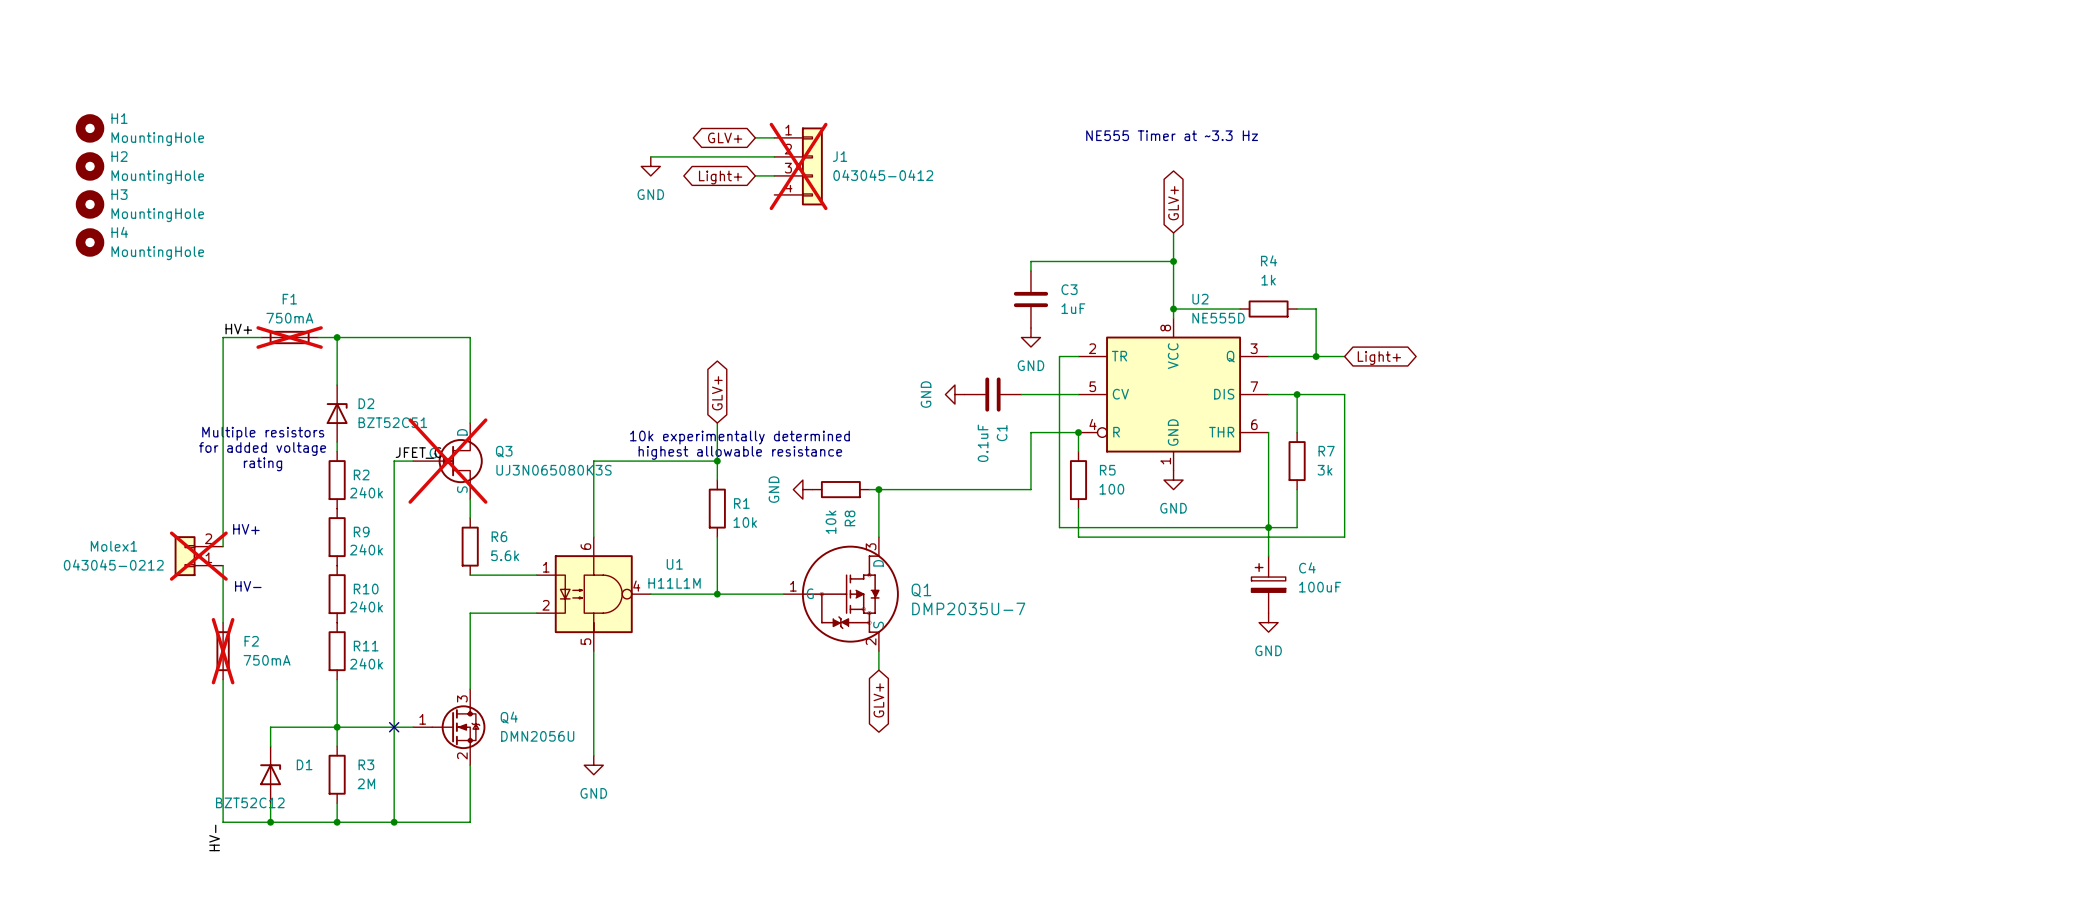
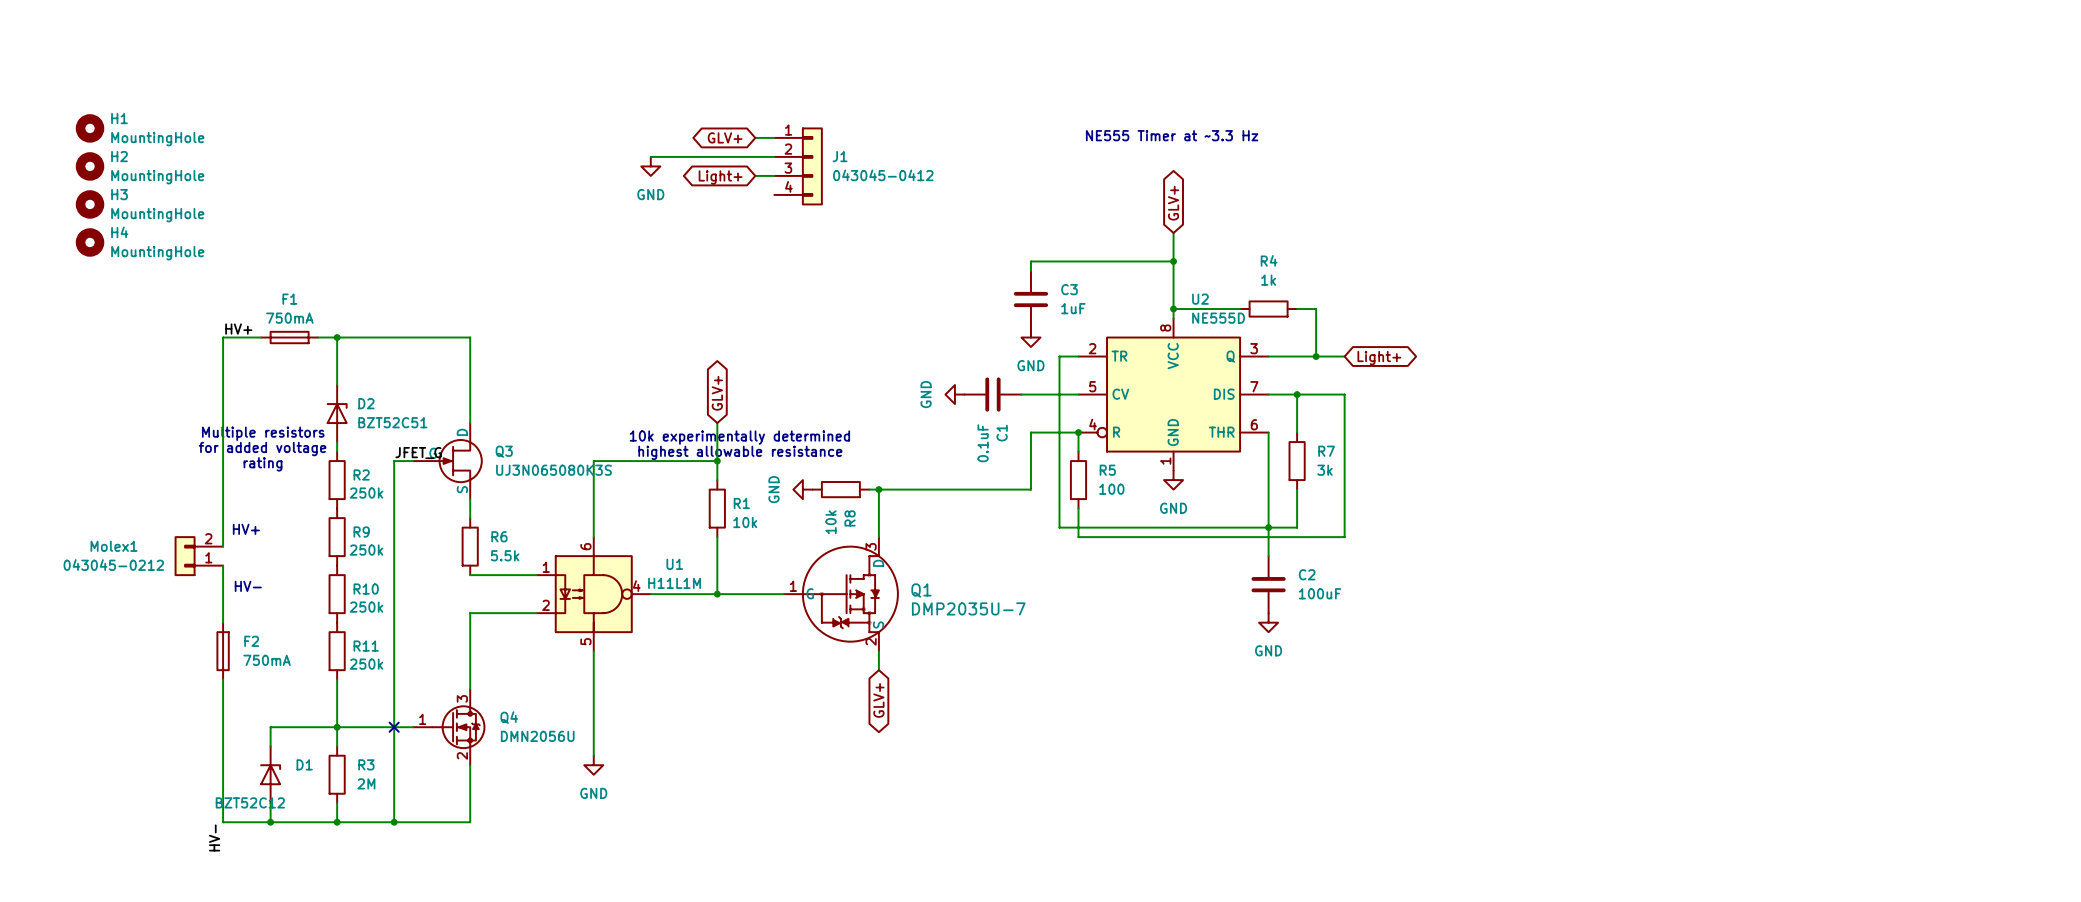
J1 do-not-place cross: (798, 166) -> none
F1 do-not-place cross: (289, 337) -> none
Q3 do-not-place cross: (447, 461) -> none
R2 value: 240k (366, 492) -> 250k (366, 493)
R9 value: 240k (366, 549) -> 250k (366, 550)
R6 value: 5.6k (505, 555) -> 5.5k (505, 555)
Molex1 do-not-place cross: (198, 556) -> none
C4: 100uF (1268, 584) -> none
C2: none -> 100uF (1268, 584)
R10 value: 240k (366, 606) -> 250k (366, 607)
F2 do-not-place cross: (223, 651) -> none
R11 value: 240k (366, 663) -> 250k (366, 664)

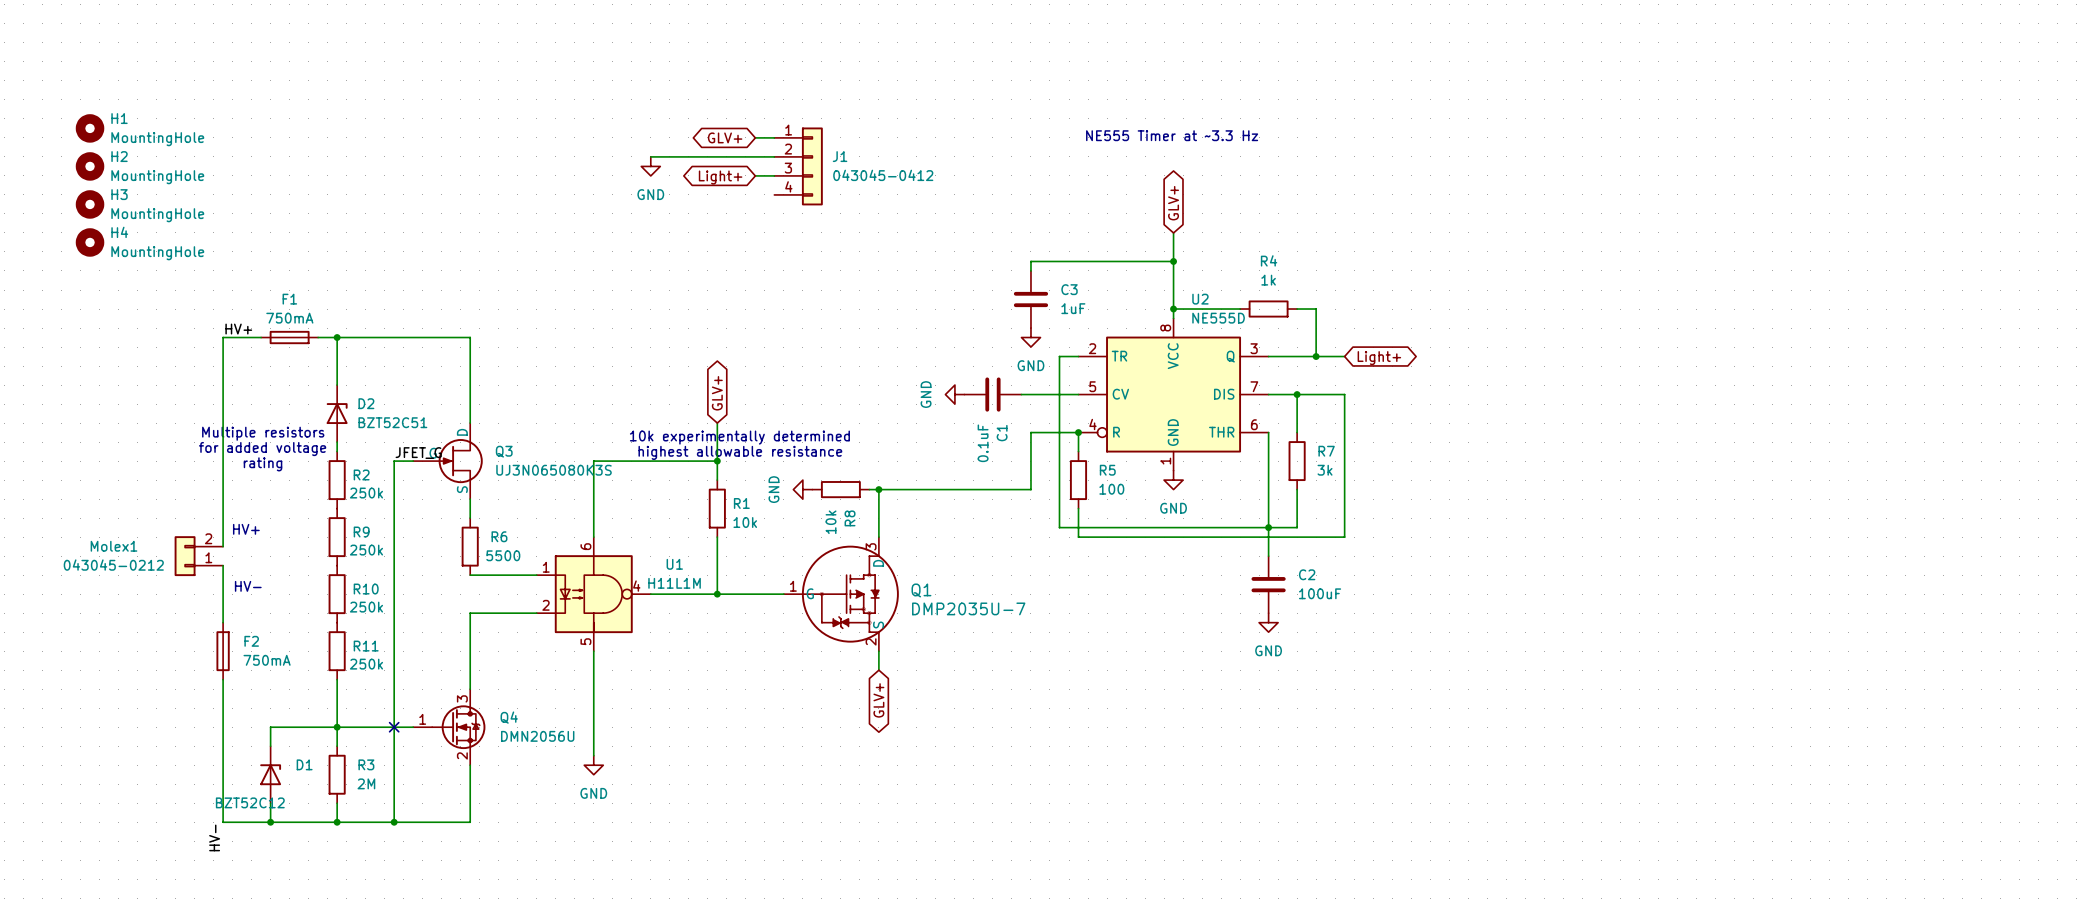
R6 value: 5.5k (505, 555) -> 5500 (503, 555)

